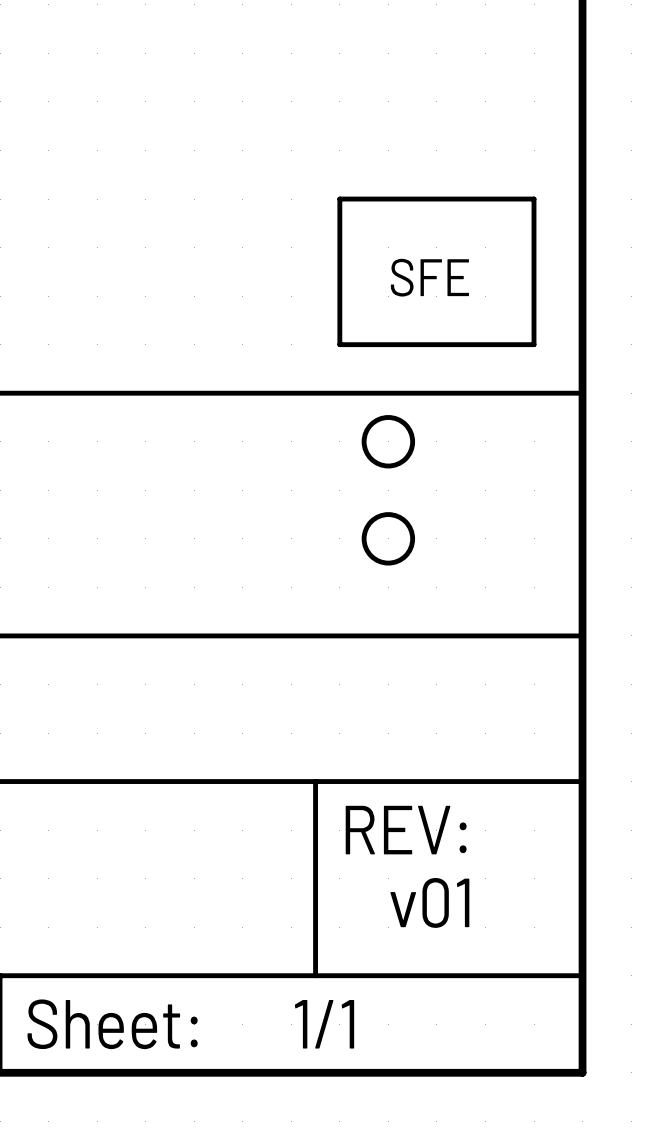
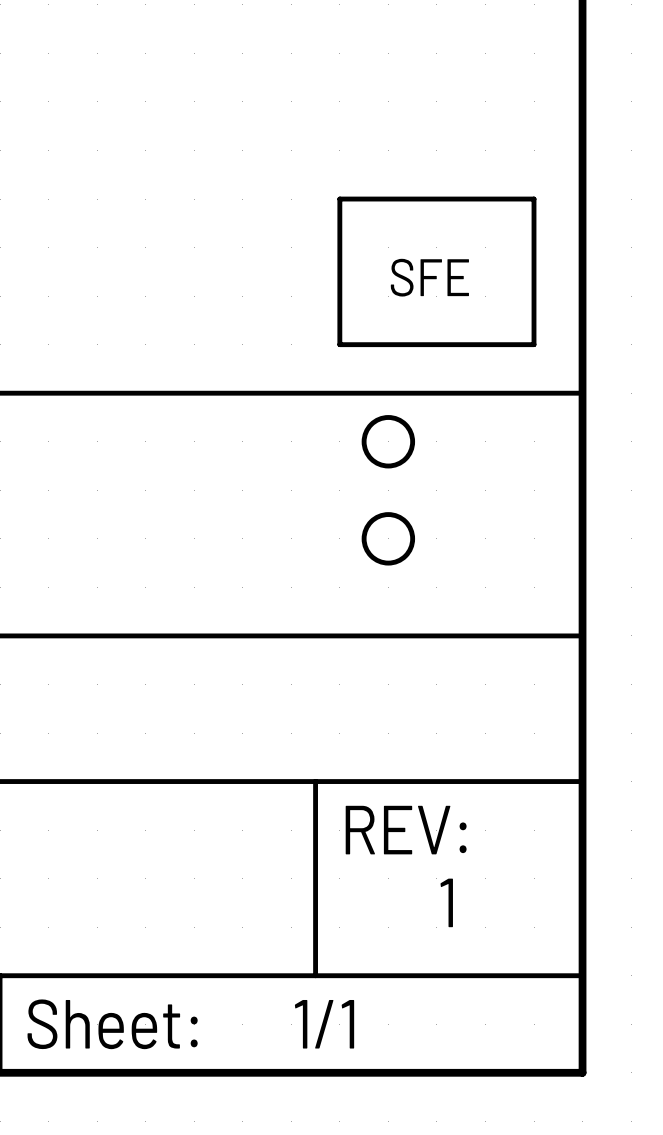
text: v01 (429, 902) -> none
text: none -> 1 (446, 902)

